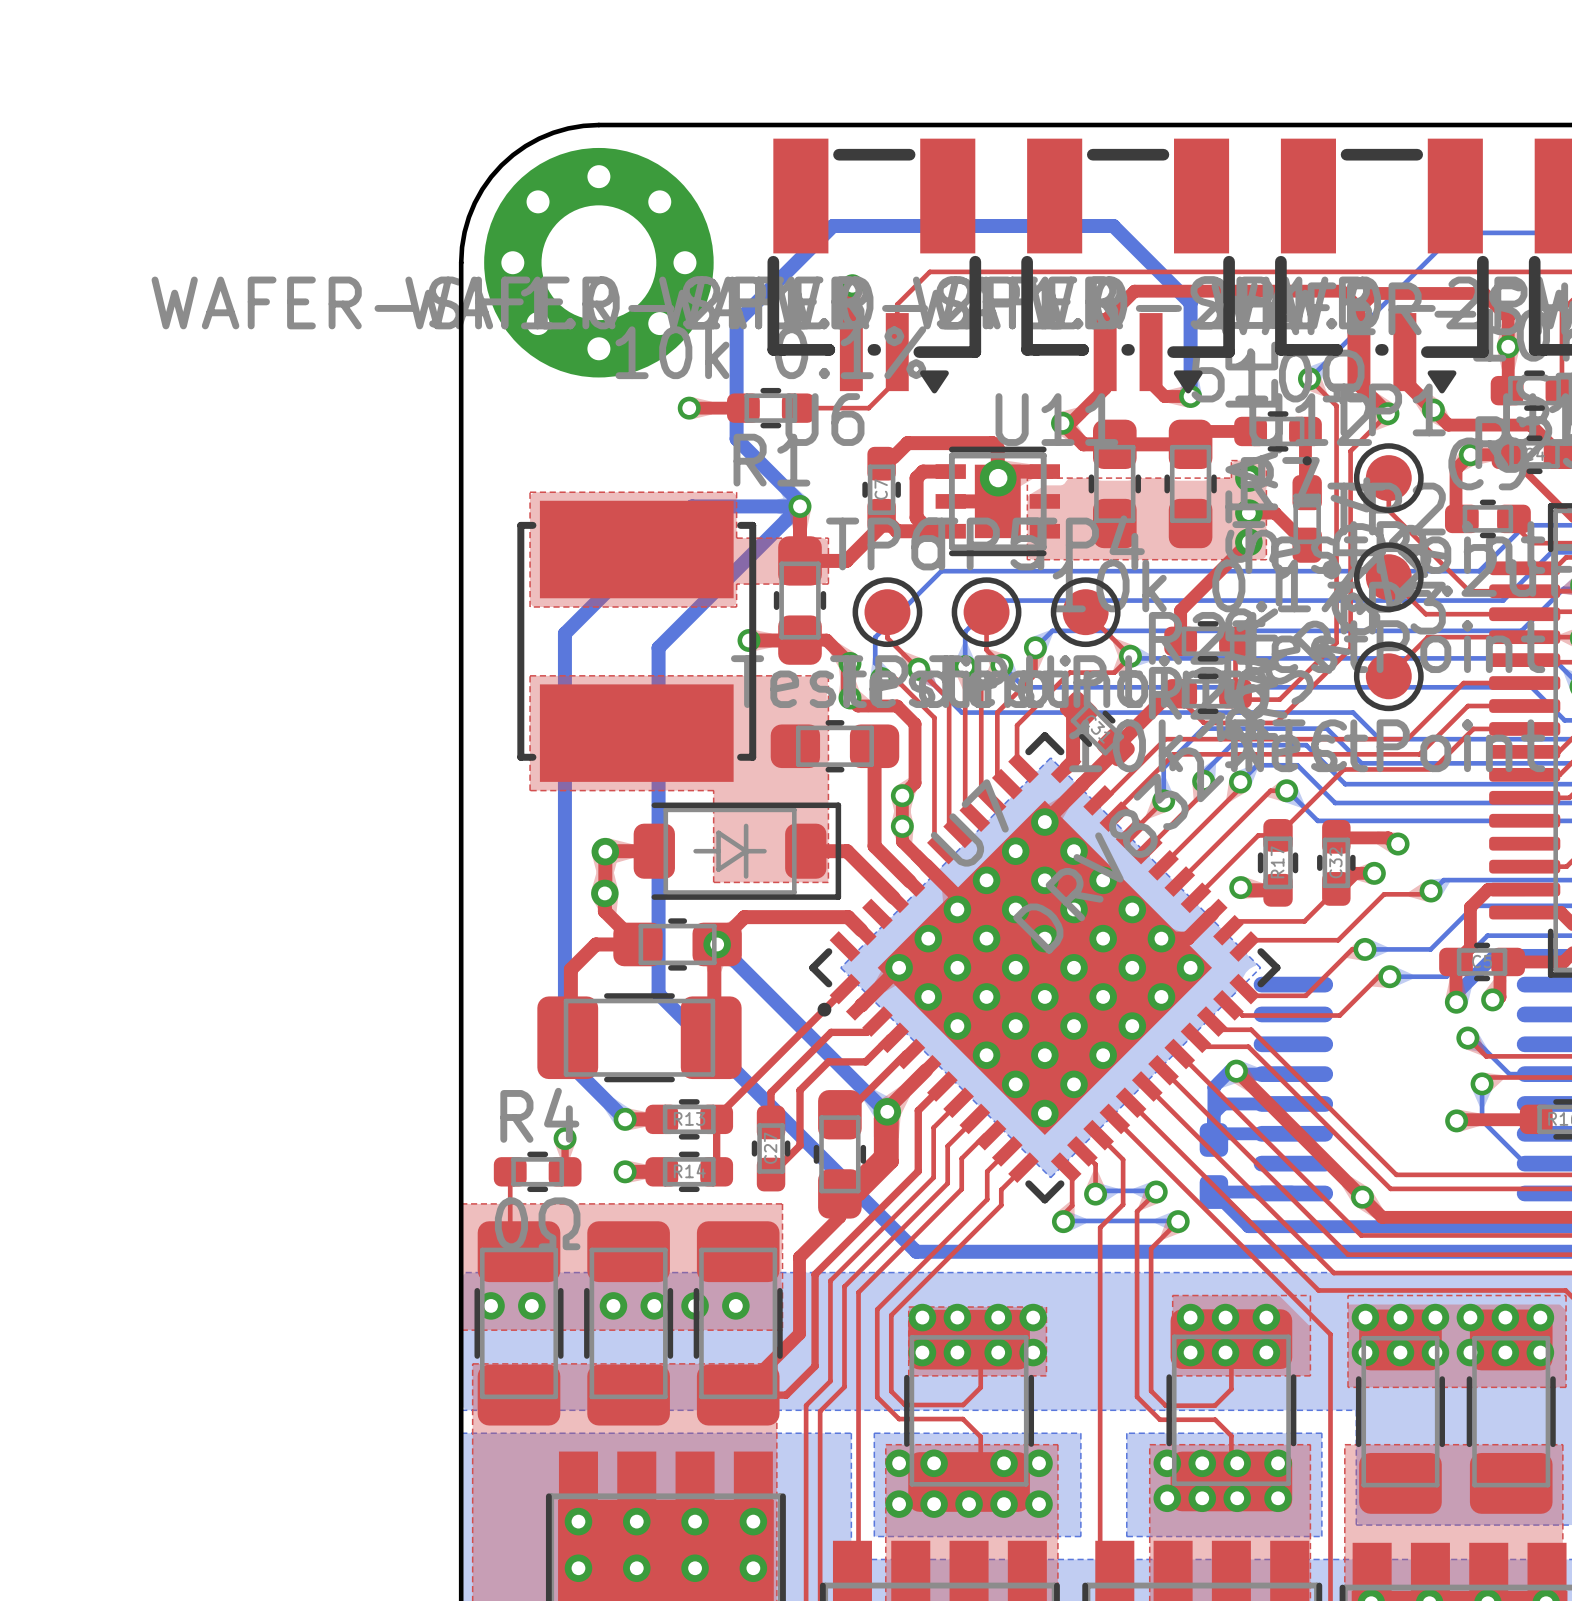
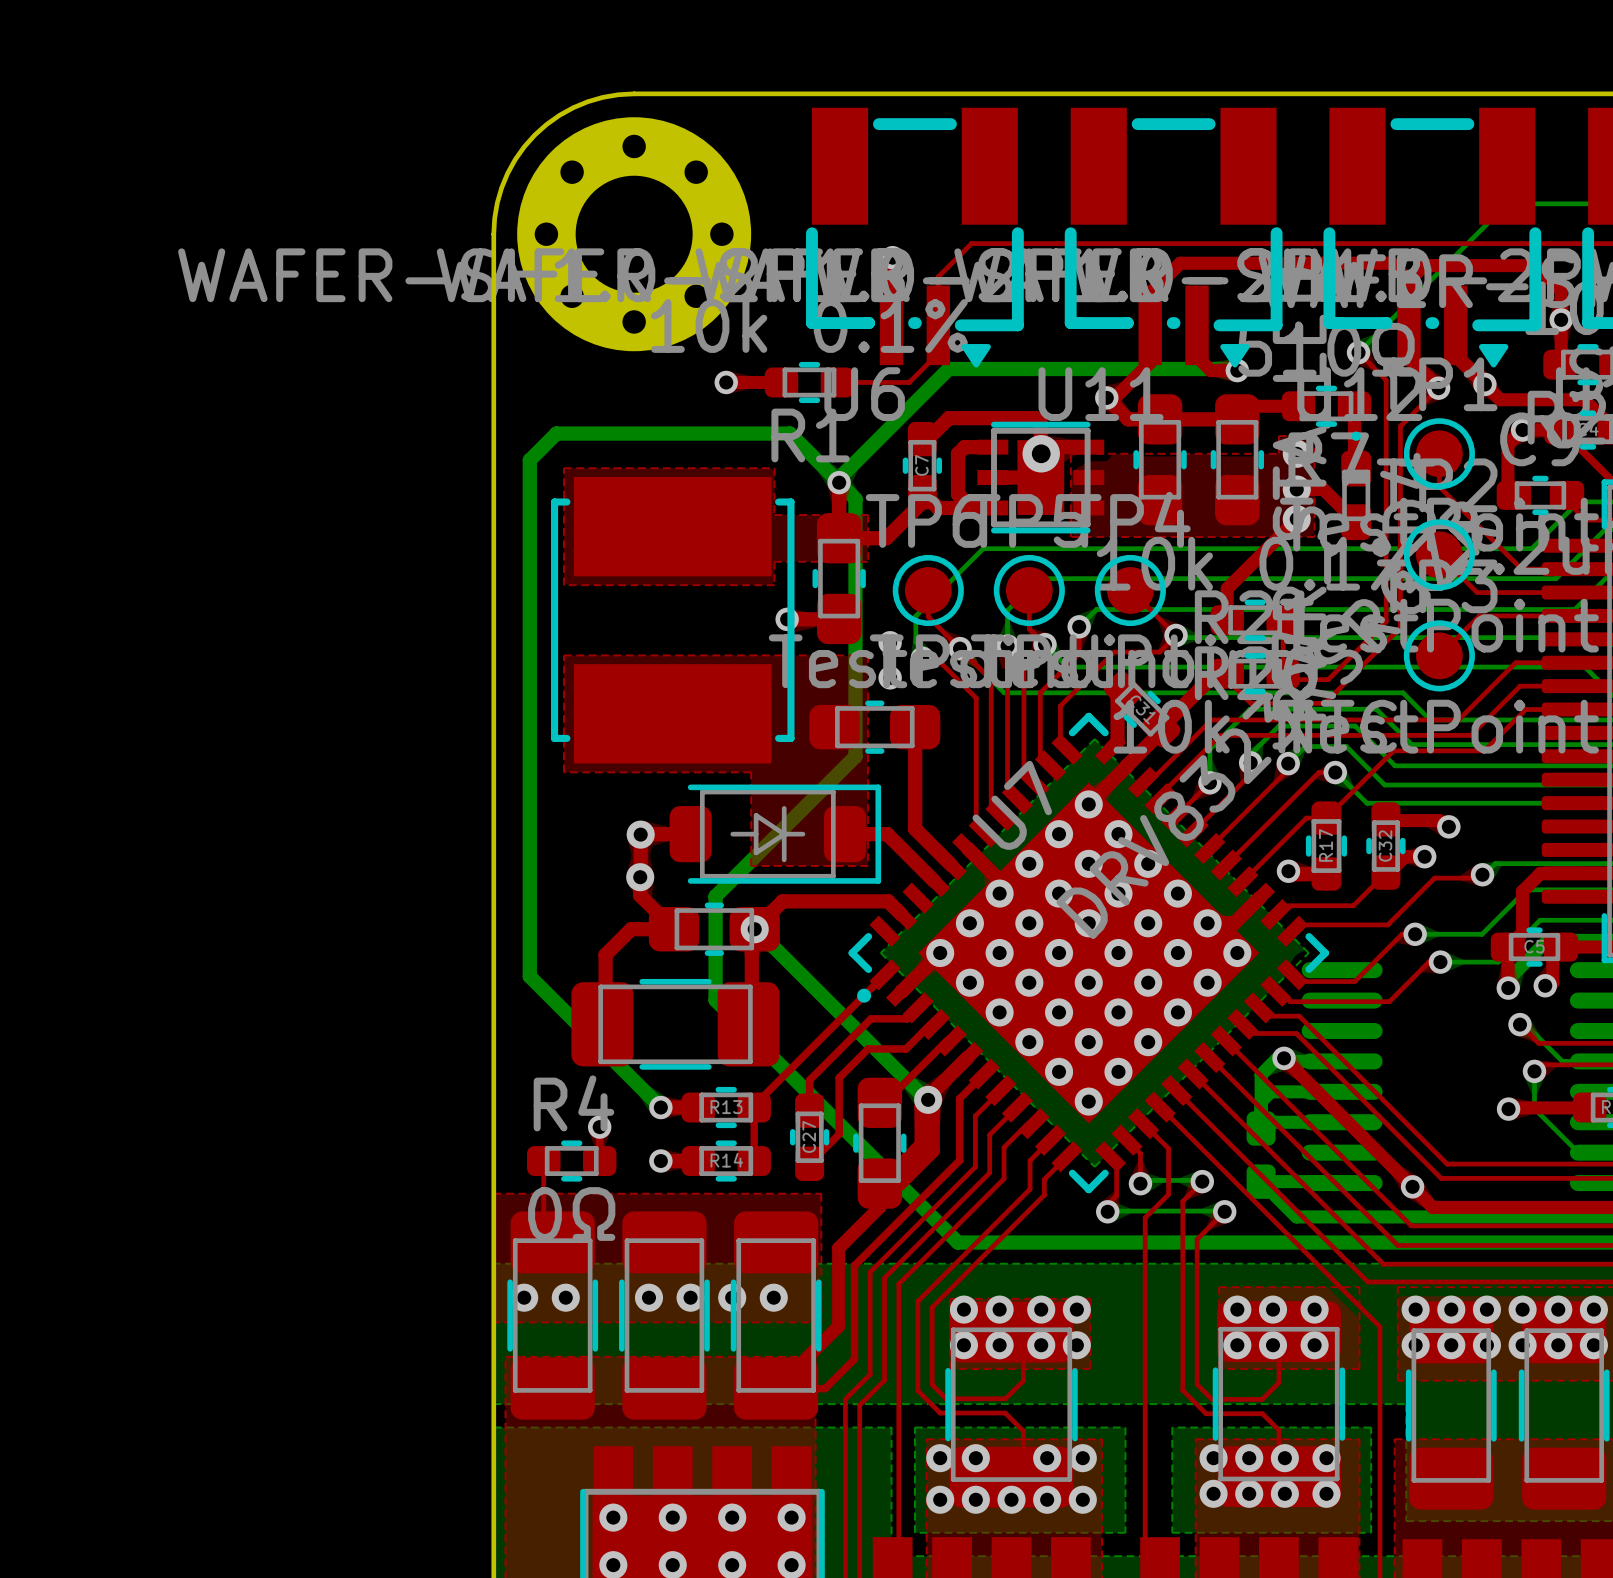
bottom track: (1190, 396) (1190, 303) (1113, 226) (833, 226) (736, 322) (736, 438) (800, 502) -> (1237, 370) (1235, 369) (948, 369) (839, 478)
top track: (800, 640) (826, 640) (849, 663) (847, 666) (847, 695) (858, 705) (897, 705) (915, 724) (915, 782) (902, 795) (902, 841) (926, 865) -> none
via: (902, 795) -> none
via: (902, 826) -> none
bottom track: (678, 1014) (658, 993) (658, 647) (800, 506) (692, 506) (564, 633) (564, 1059) -> (715, 1000) (715, 896) (855, 756) (855, 499) (790, 433) (556, 433) (529, 460) (529, 976) (599, 1046)

